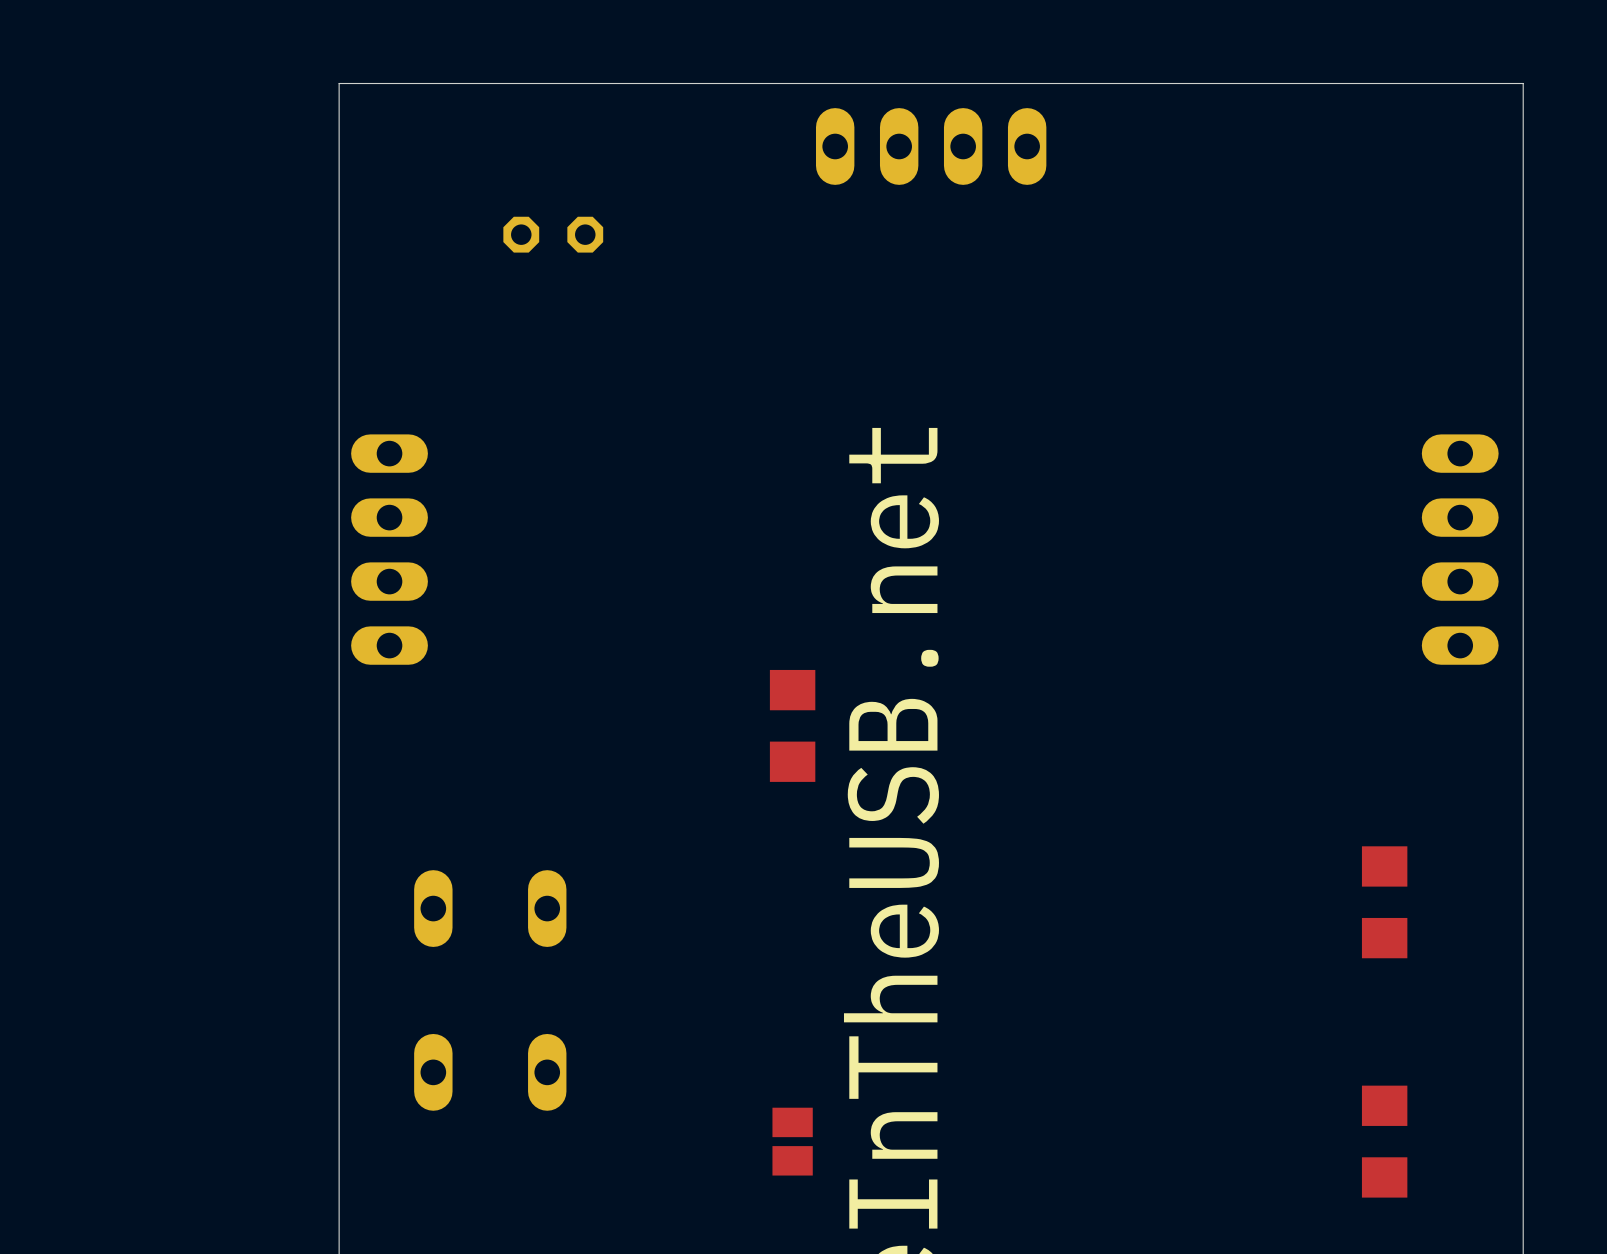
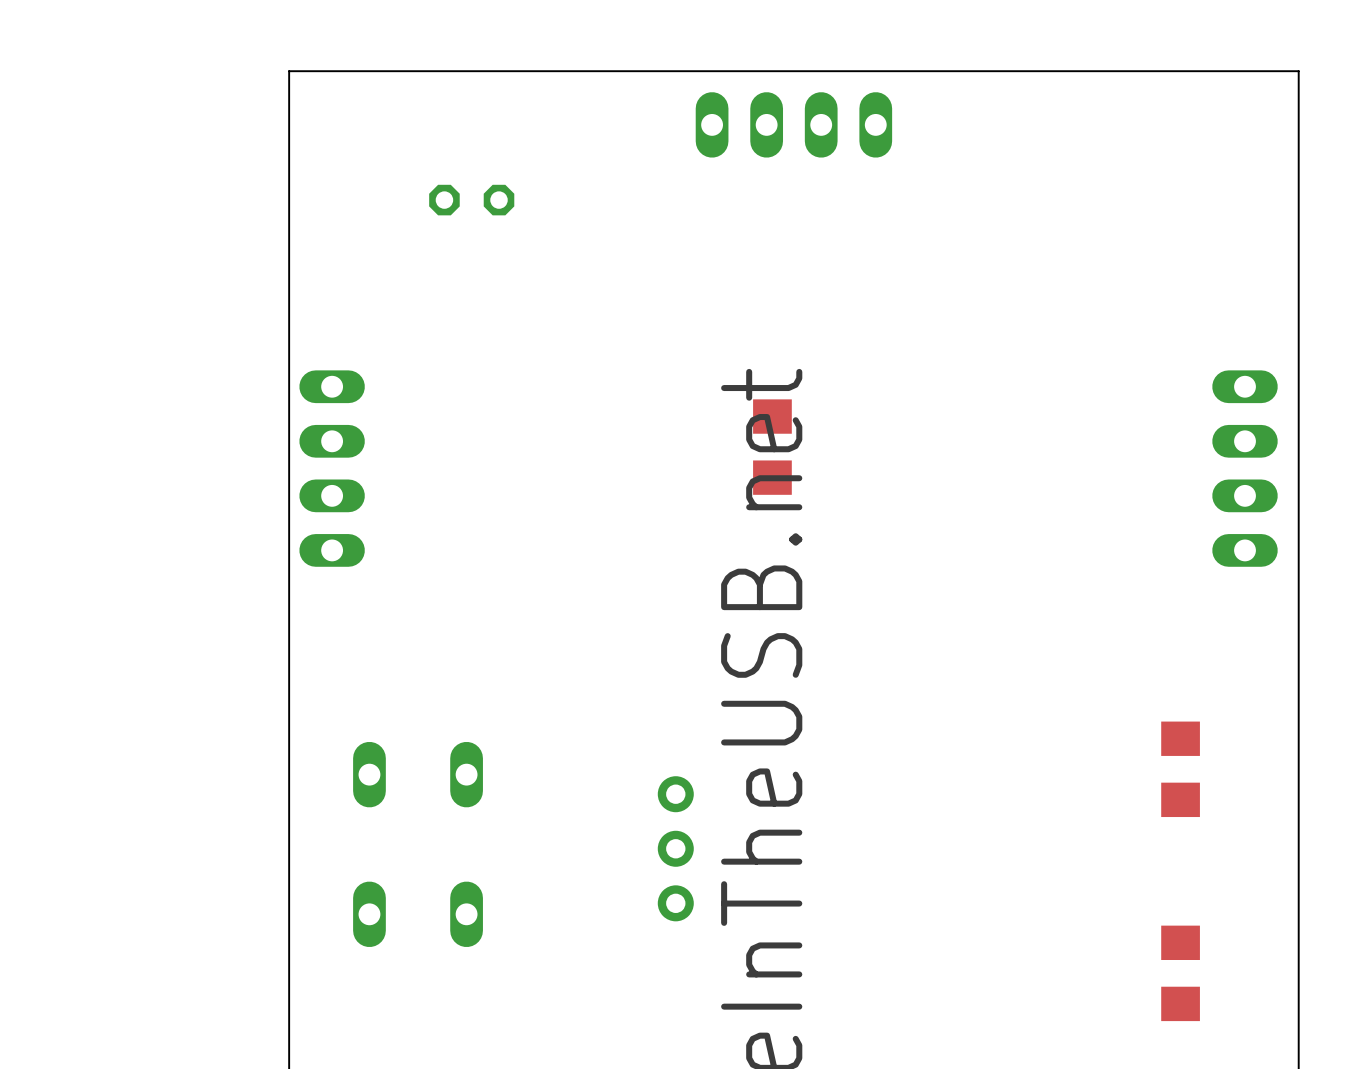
part position: (792, 725) -> (772, 447)
part: none -> (675, 848)
part: (792, 1141) -> none

